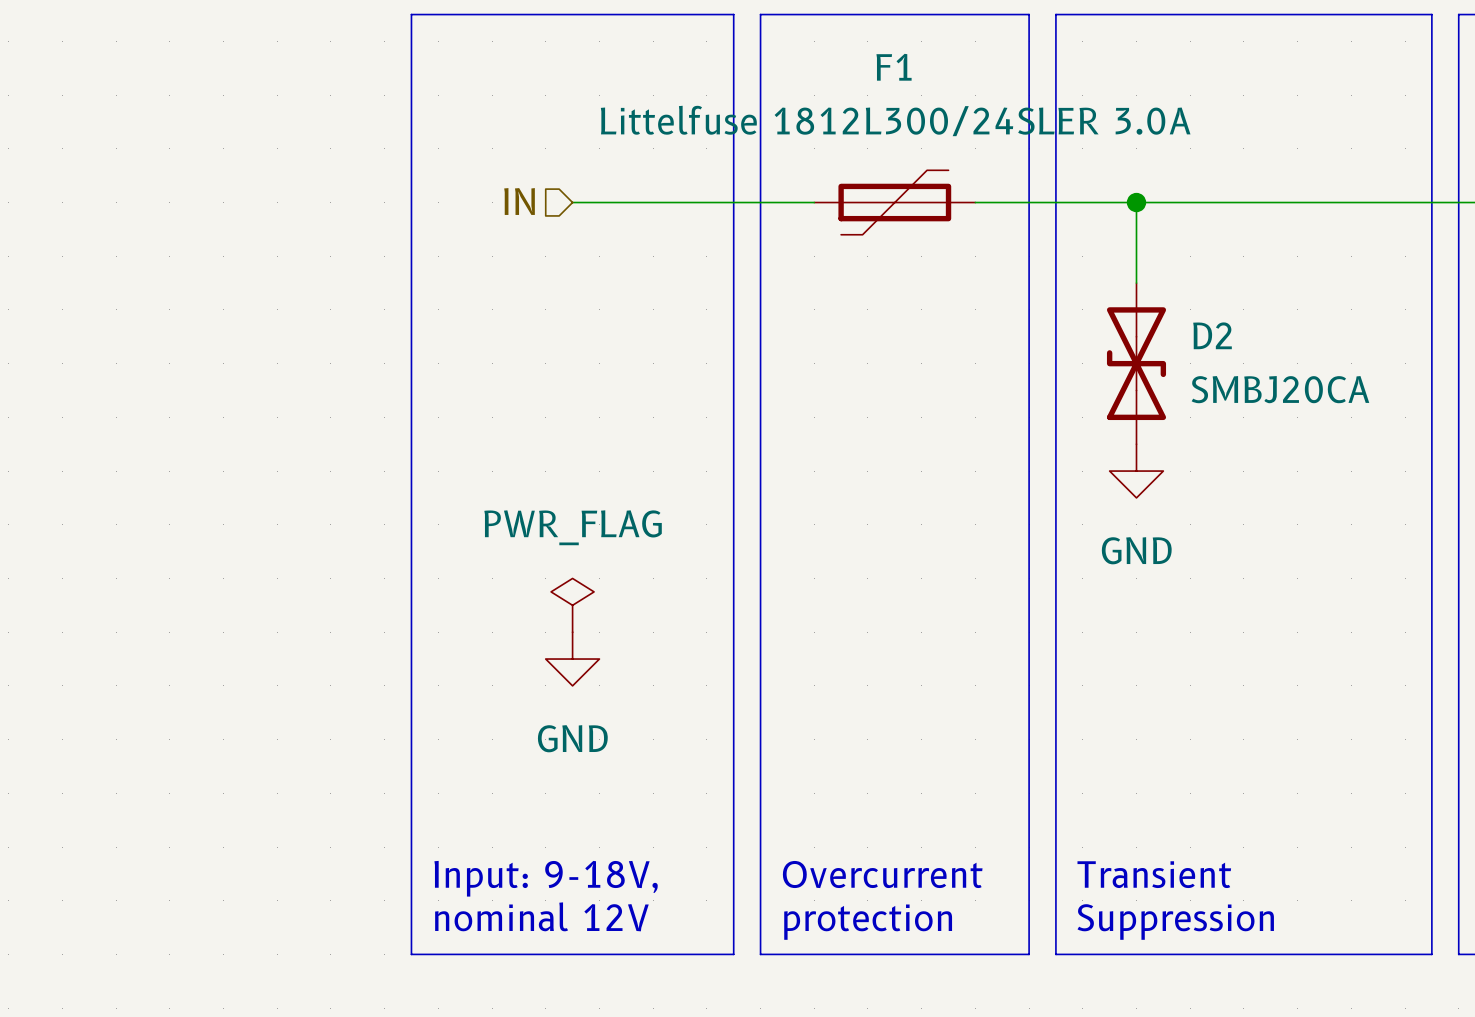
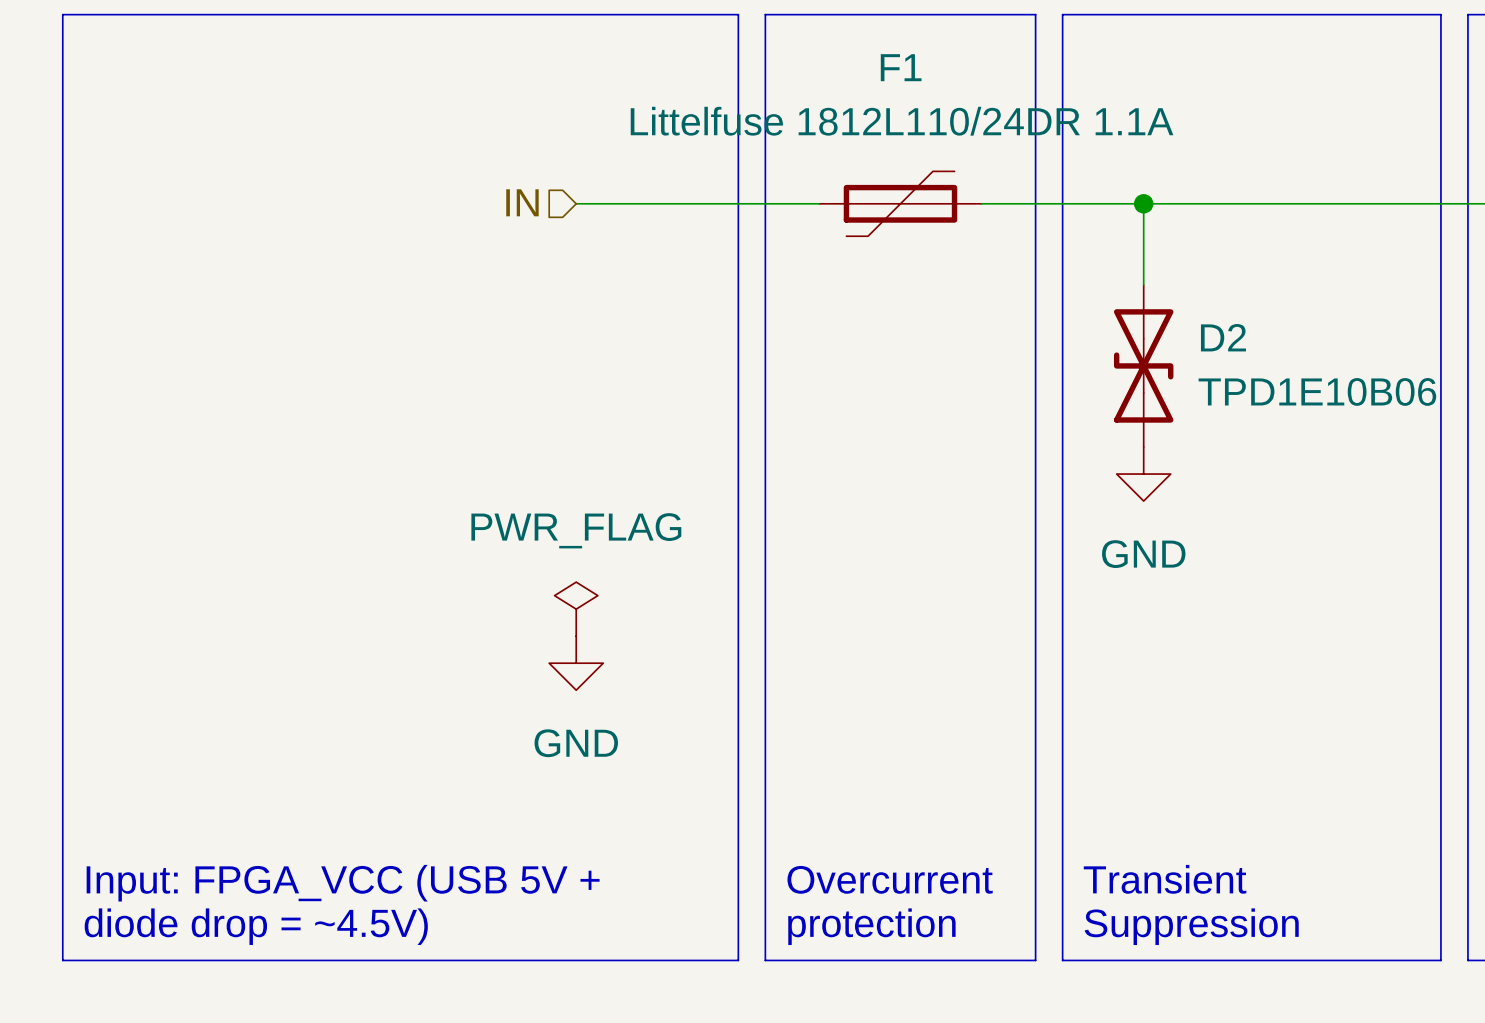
line: (411, 14) (411, 954) -> (414, 14) (62, 14) (62, 960) (414, 960)
F1 value: Littelfuse 1812L300/24SLER 3.0A (895, 120) -> Littelfuse 1812L110/24DR 1.1A (902, 121)
D2 value: SMBJ20CA (1280, 389) -> TPD1E10B06 (1317, 391)
text: none -> Input: FPGA_VCC (USB 5V + (343, 883)
text: Input: 9-18V, (546, 878) -> none
text: nominal 12V (541, 916) -> none
text: none -> diode drop = ~4.5V) (256, 926)

